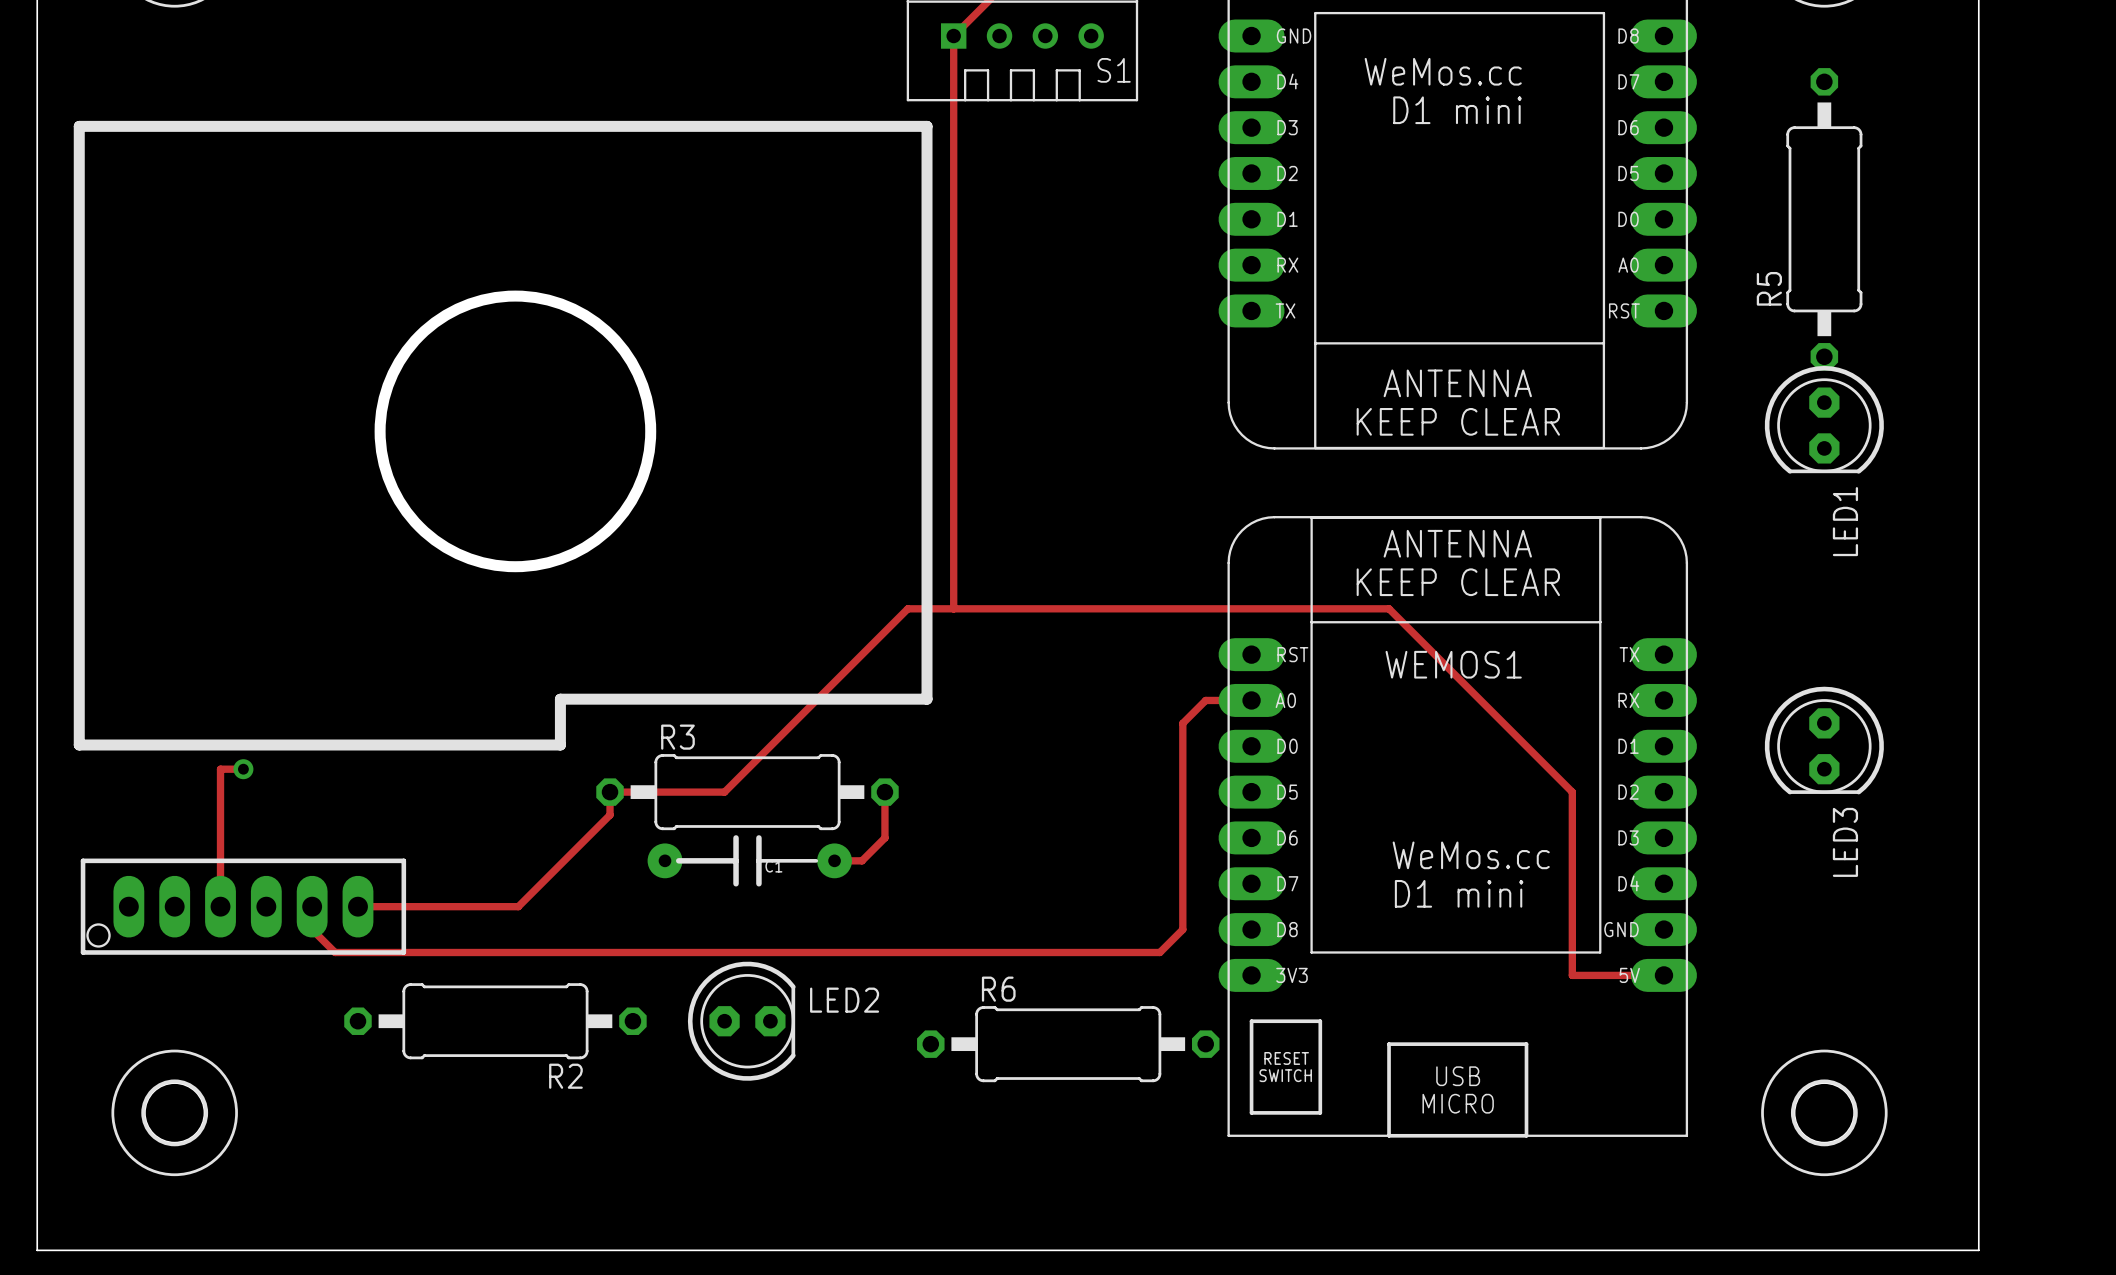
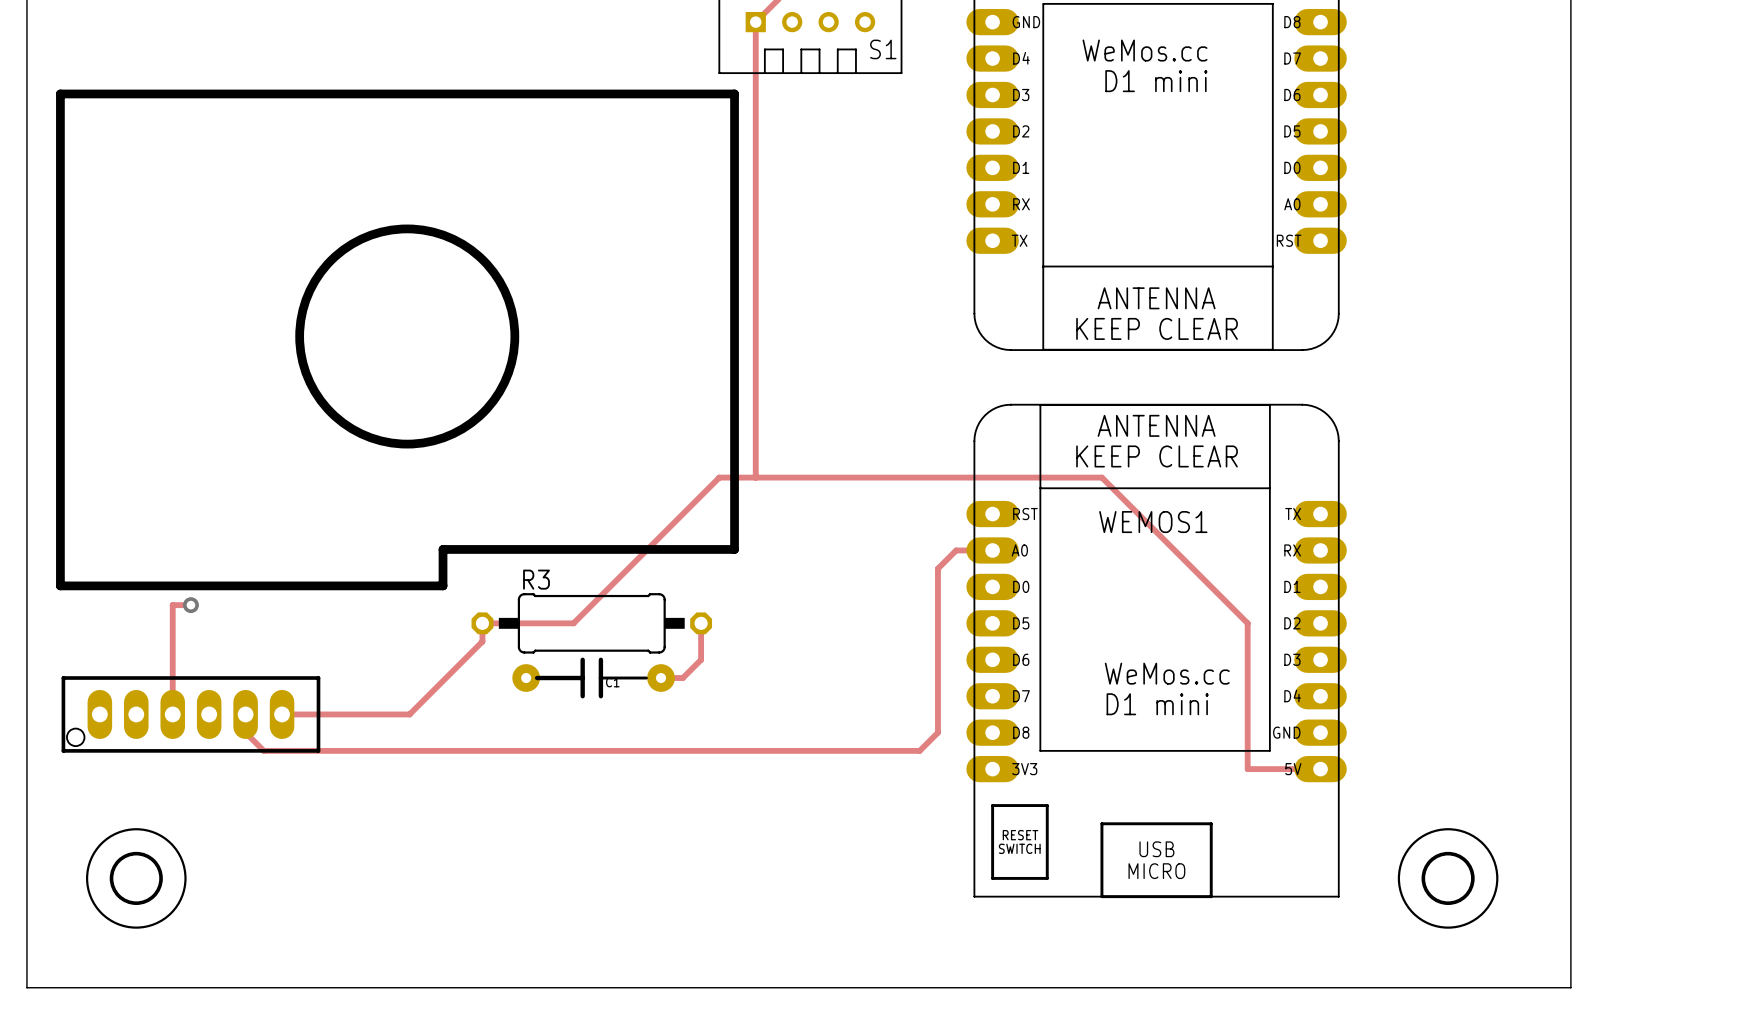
R5: (1824, 219) -> none
LED1: (1824, 419) -> none
LED3: (1824, 740) -> none
R2: (495, 1021) -> none
LED2: (741, 1021) -> none
R6: (1068, 1044) -> none

